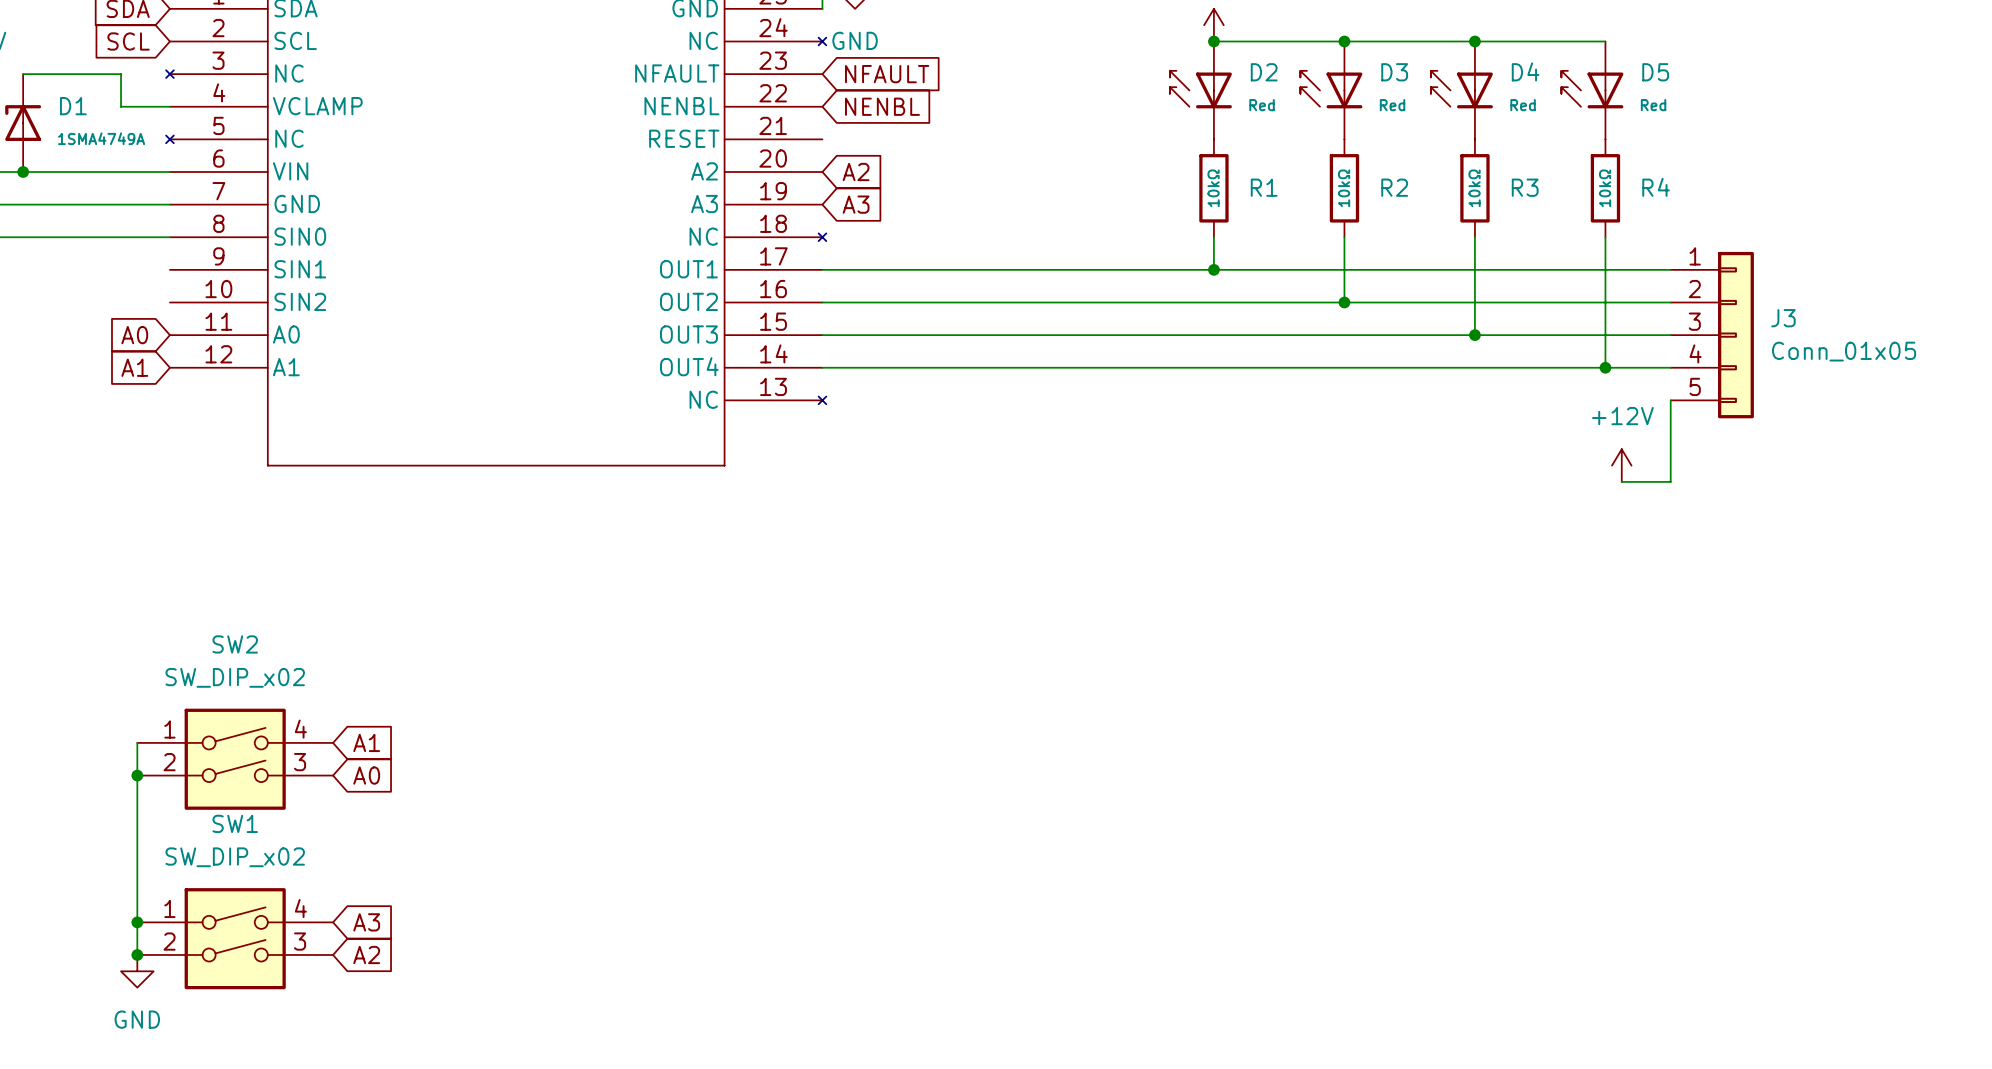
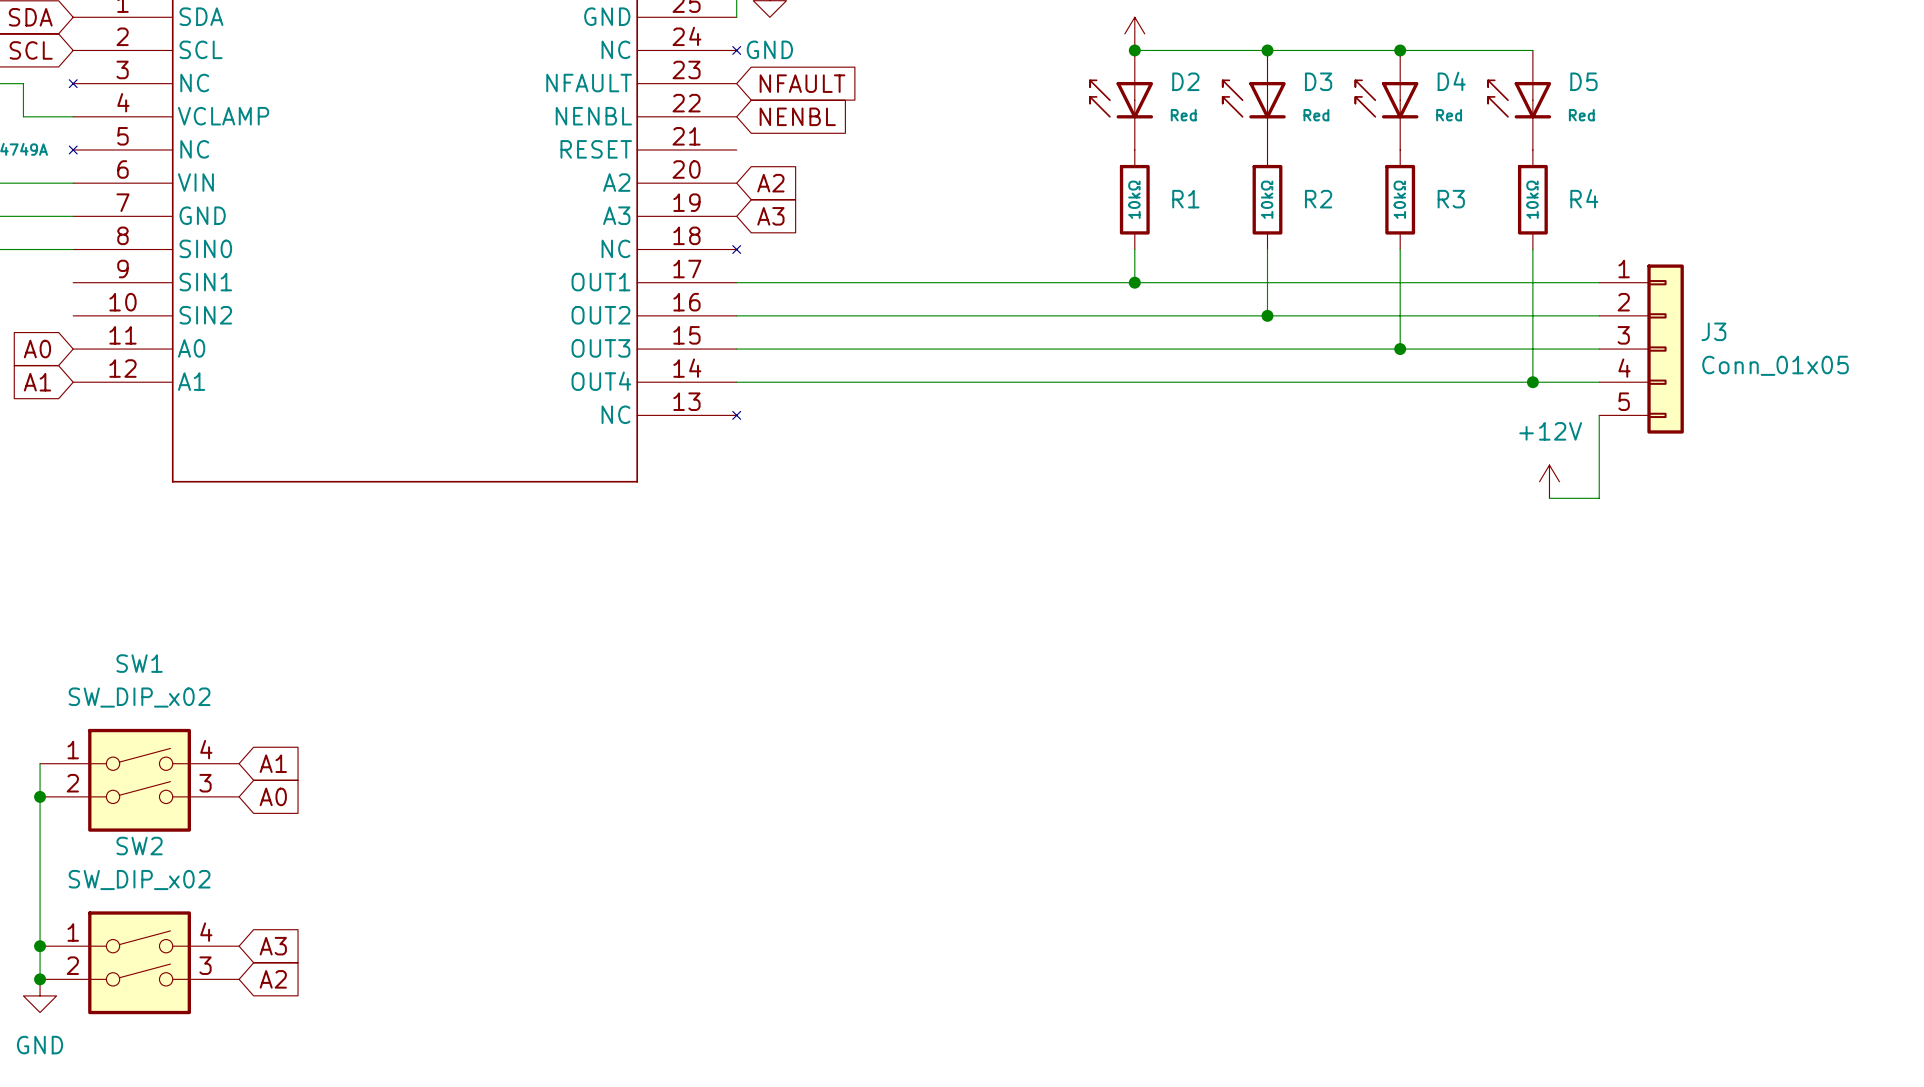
SW2 name: SW2 (235, 644) -> SW1 (139, 663)
SW1 name: SW1 (235, 823) -> SW2 (139, 846)

